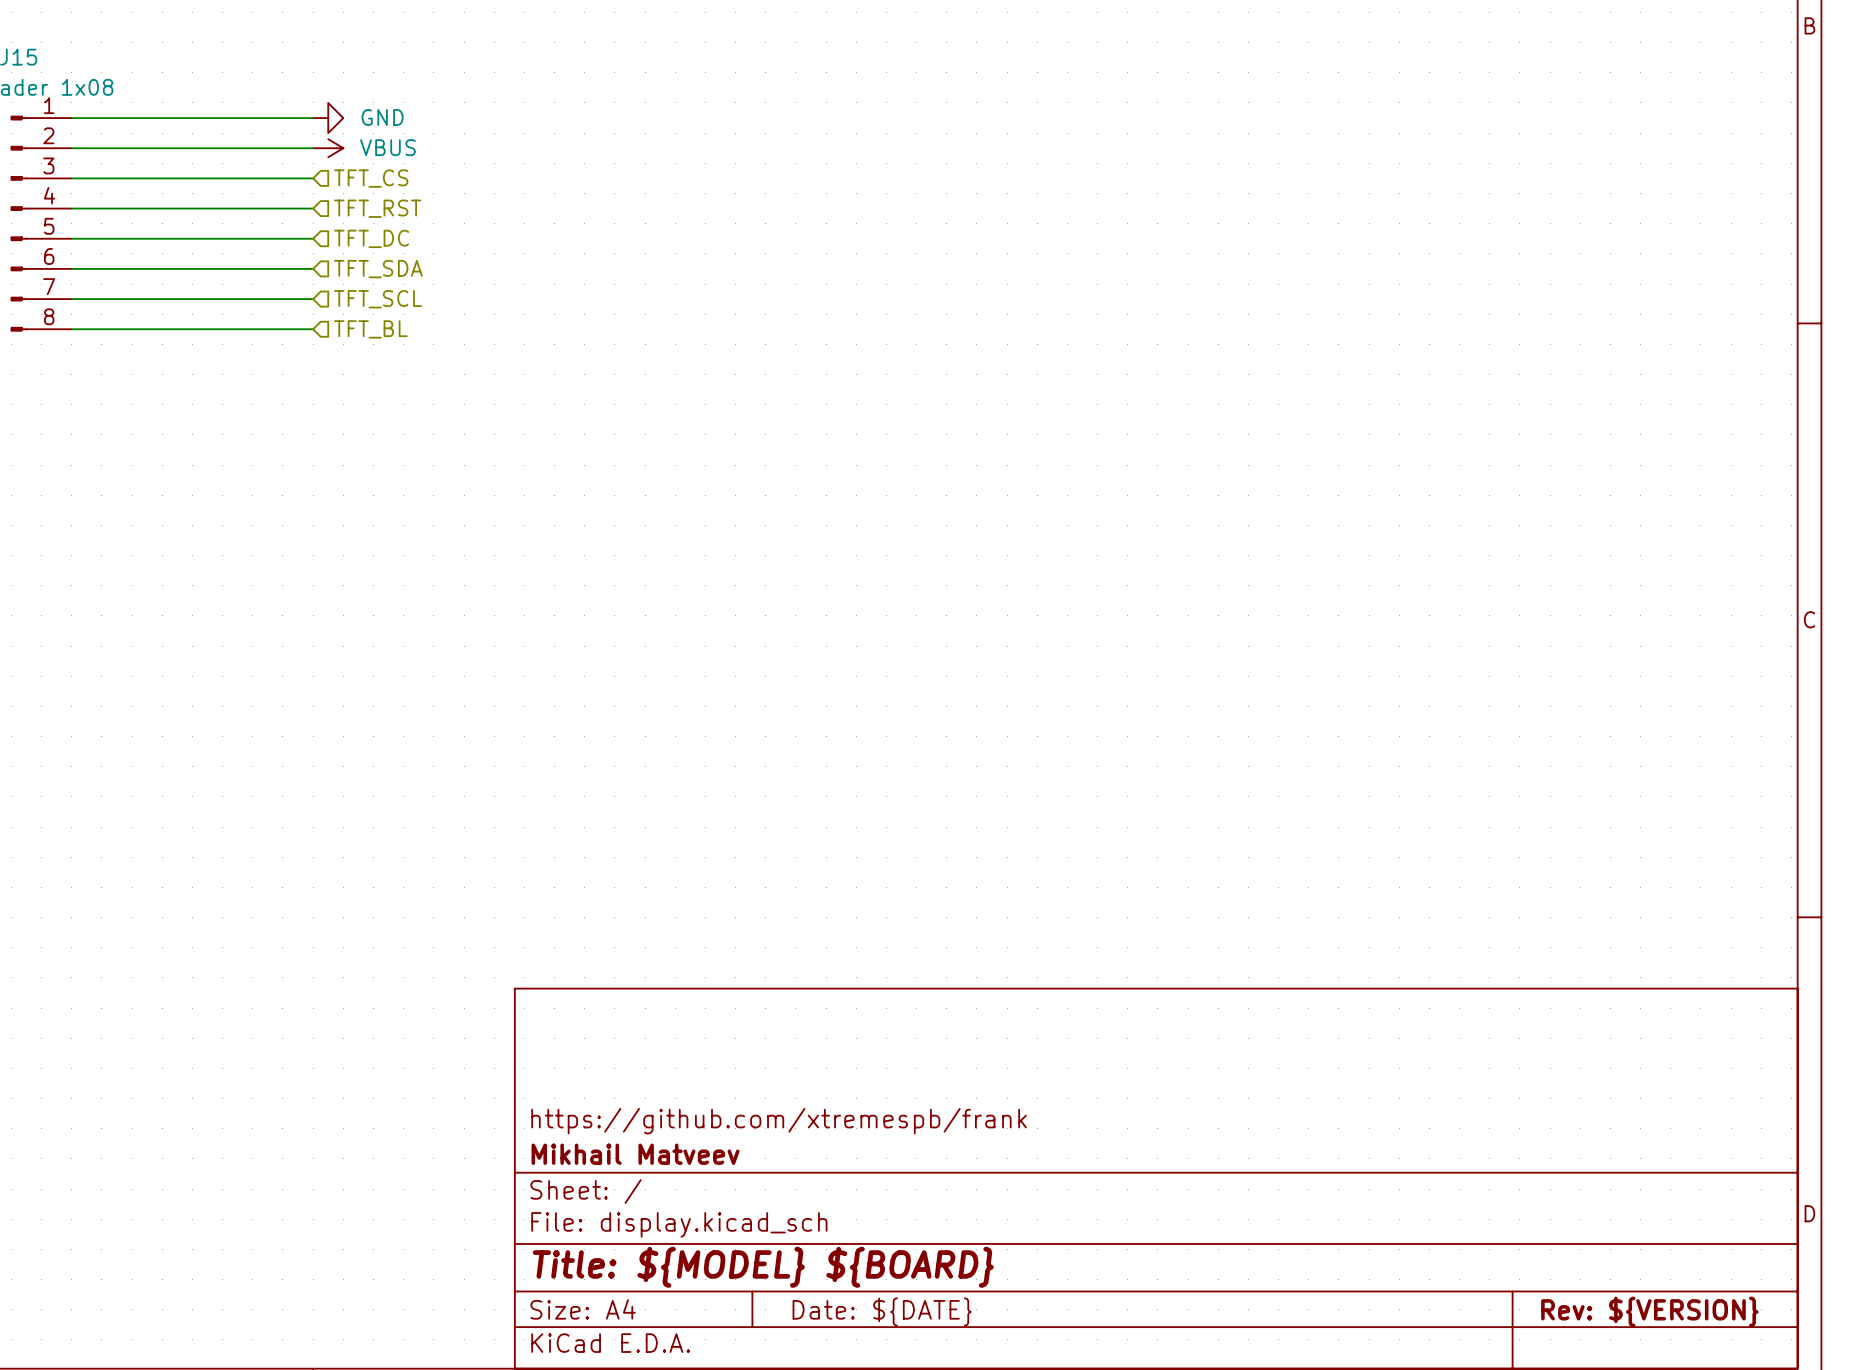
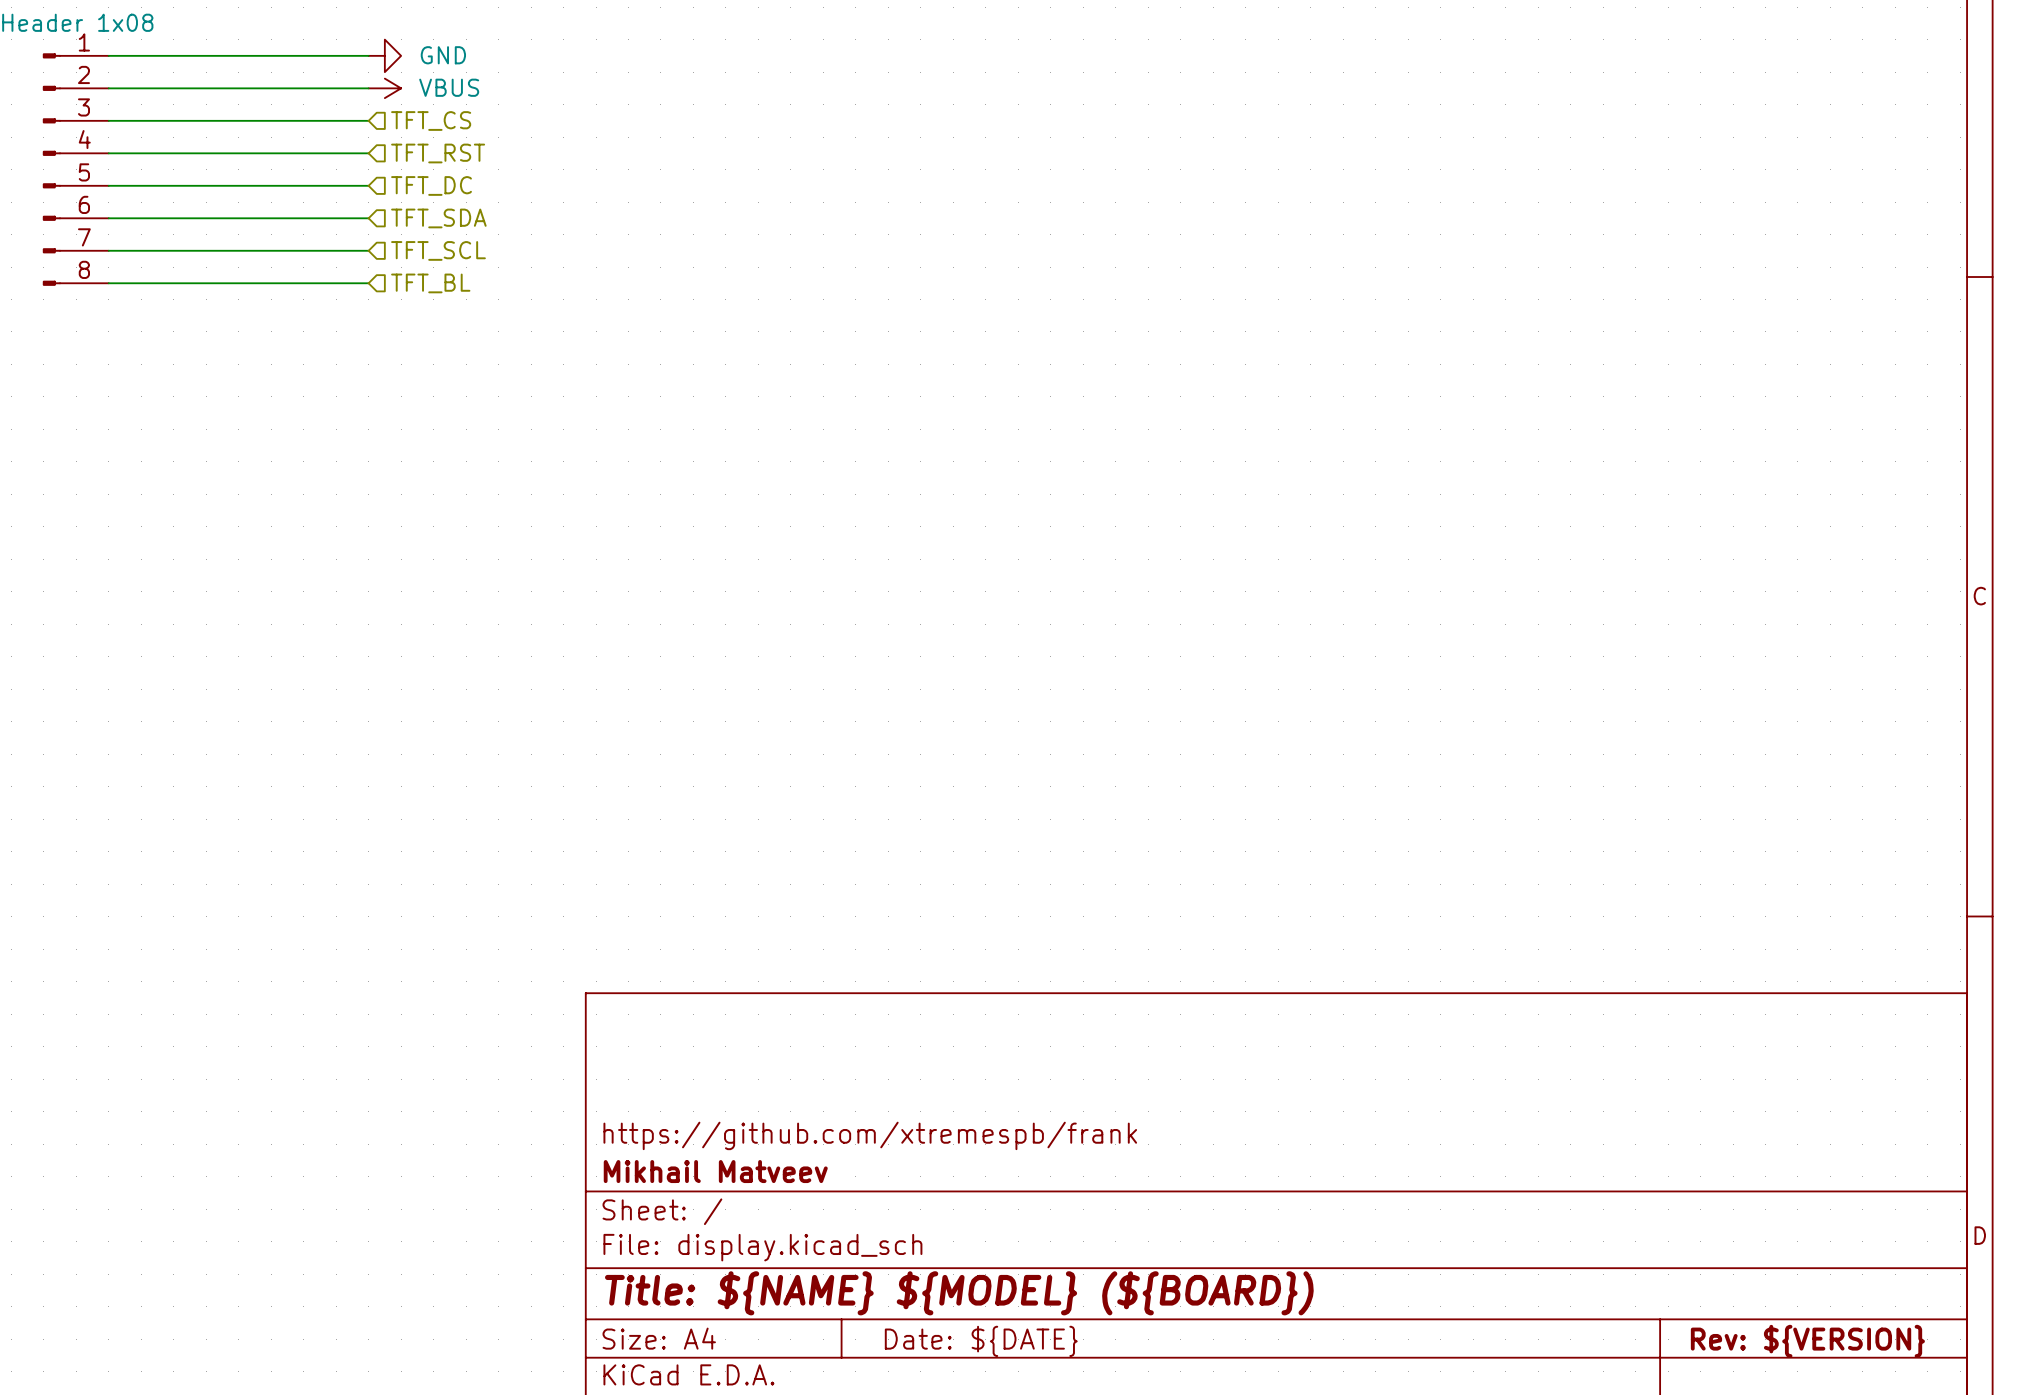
title block: Title: ${MODEL} ${BOARD} (763, 1267) -> Title: ${NAME} ${MODEL} (${BOARD}) (959, 1293)

